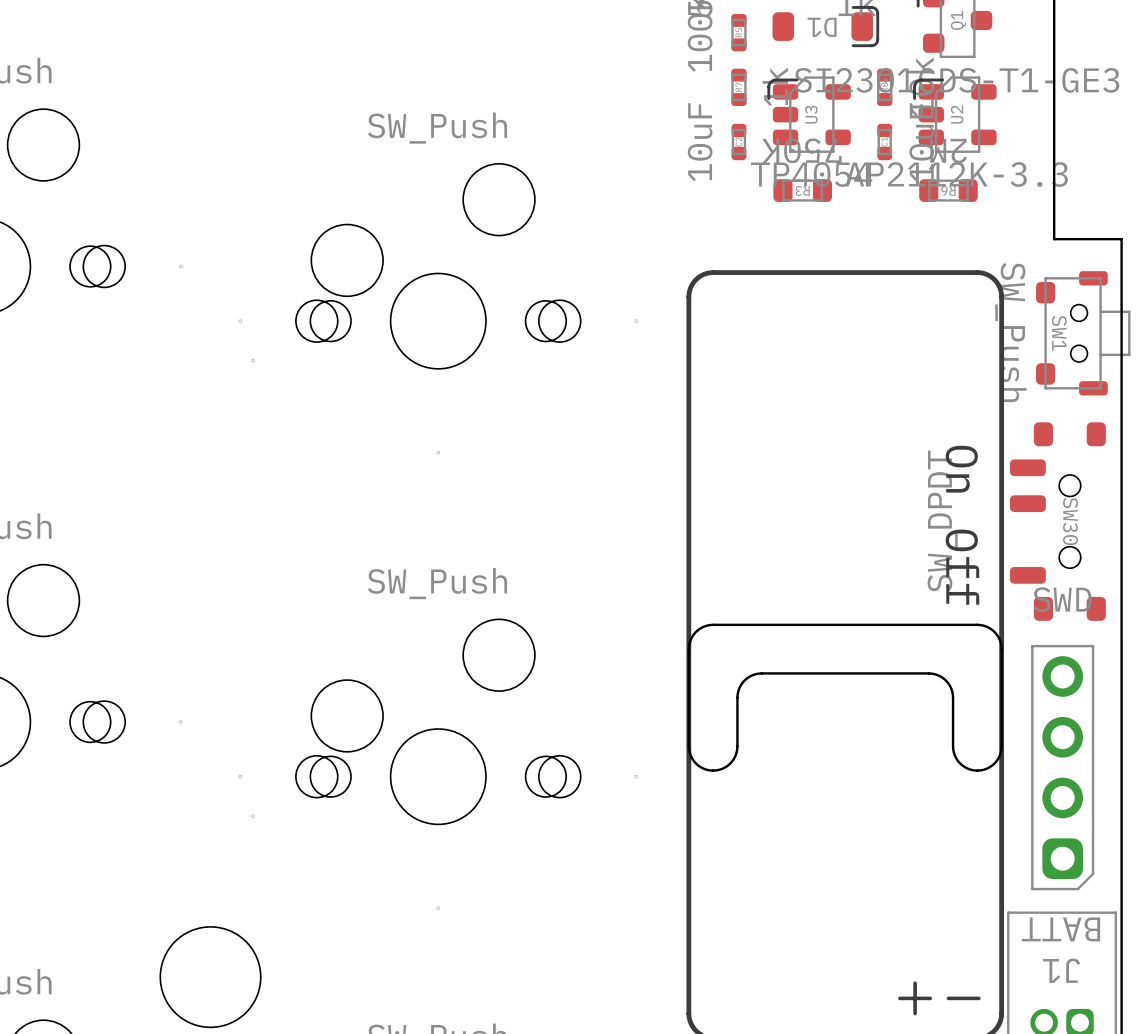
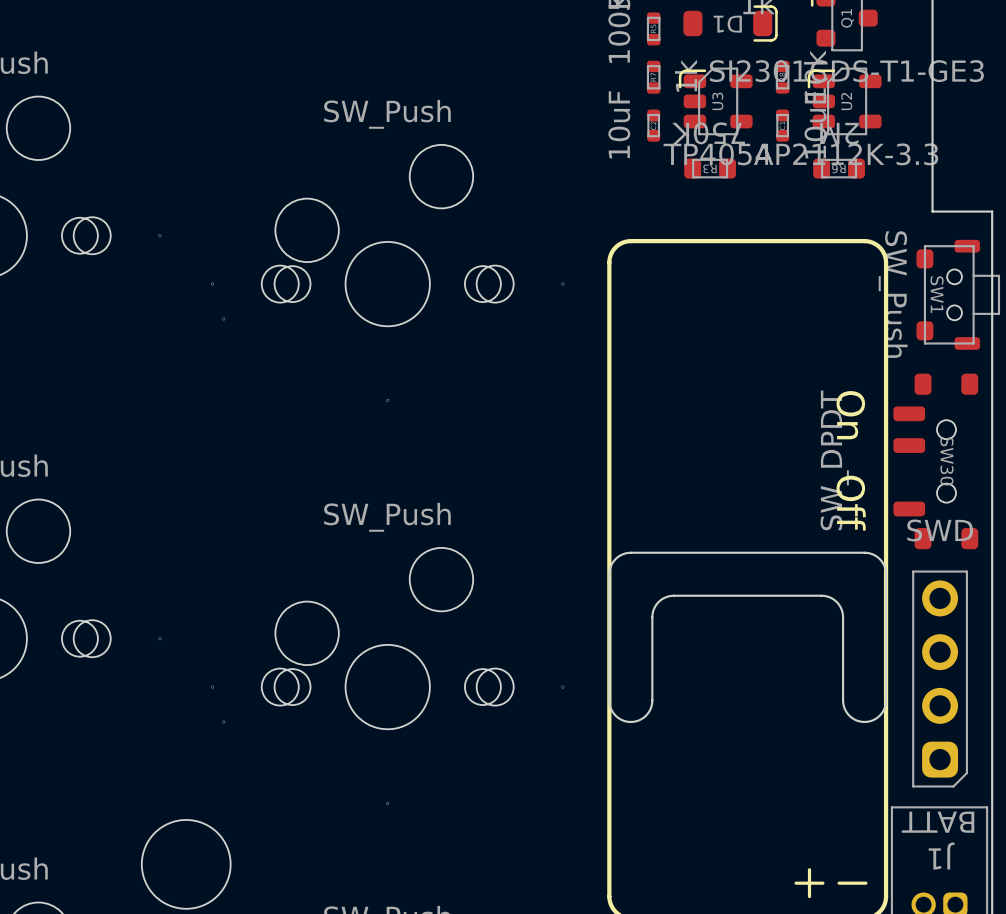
board edge: (688, 746) (690, 755) (695, 763) (703, 768) (713, 770) (722, 768) (730, 763) (735, 755) (737, 746) -> (609, 660) (610, 708) (620, 719) (630, 721) (641, 719) (650, 708) (652, 660)
board edge: (953, 746) (954, 755) (960, 763) (968, 768) (977, 770) (986, 768) (994, 763) (999, 755) (1001, 746) -> (843, 660) (844, 708) (853, 719) (864, 721) (875, 719) (884, 708) (886, 660)

